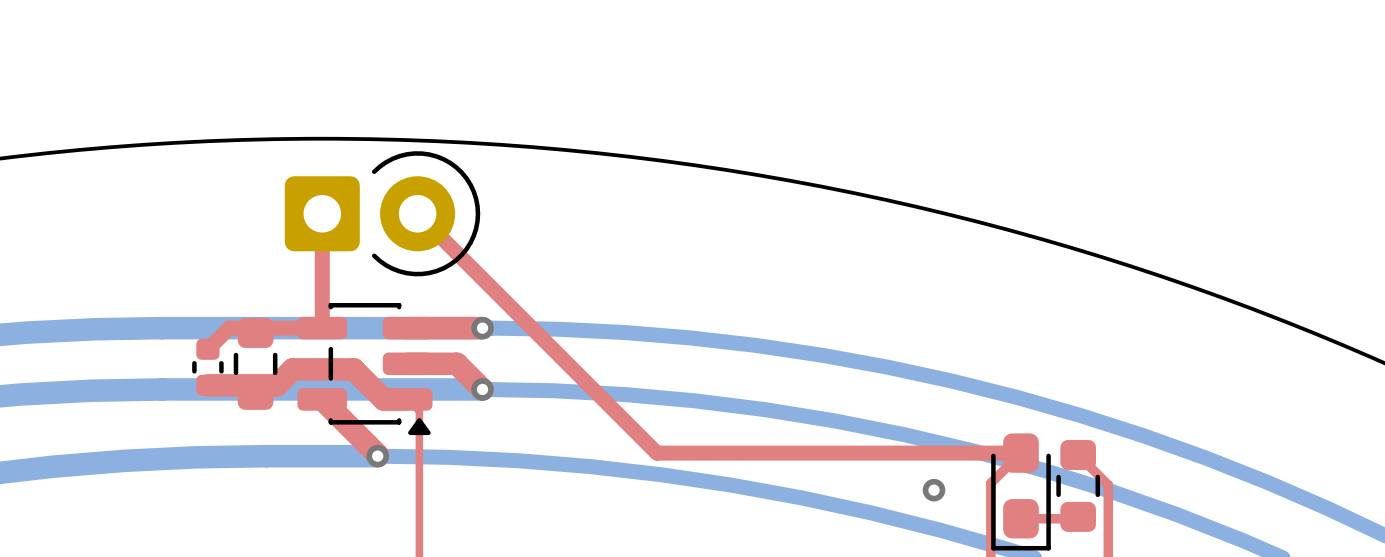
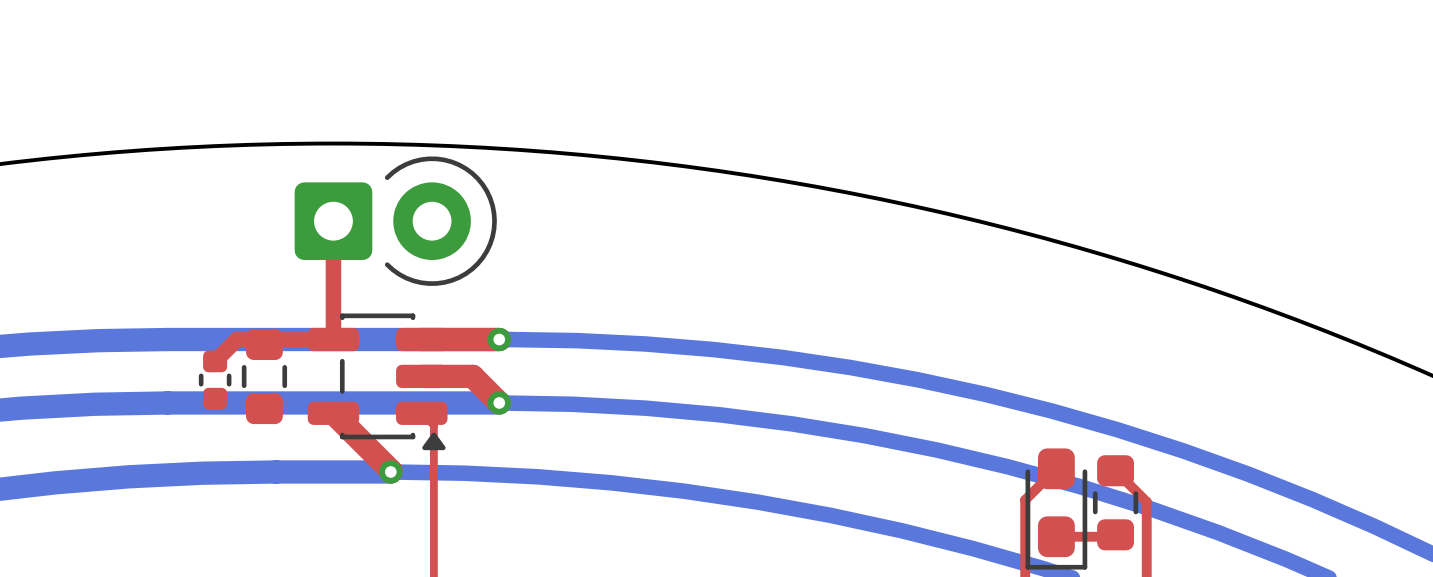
top track: (417, 213) (656, 453) (1020, 453) -> none
top track: (207, 385) (276, 385) (292, 369) (353, 369) (383, 399) (407, 399) -> none
via: (934, 490) -> none

